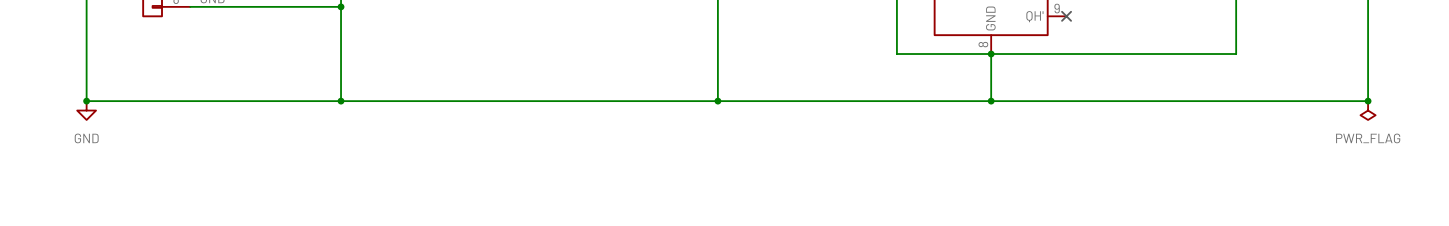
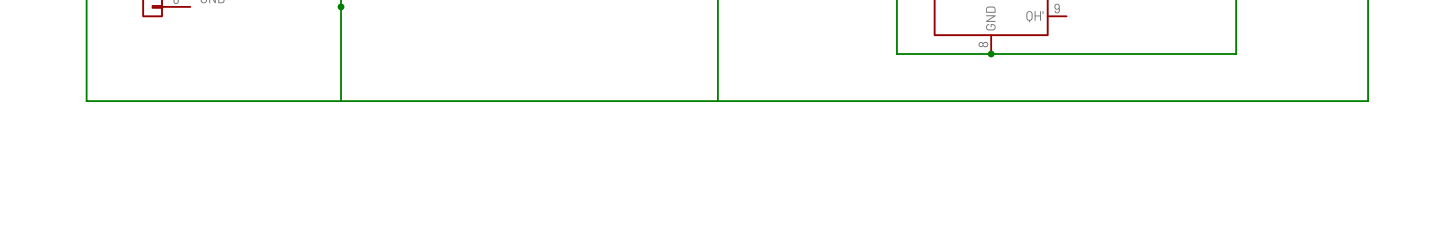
wire: (190, 6) (341, 6) -> none
no-connect mark: (1066, 16) -> none
wire: (991, 54) (991, 101) -> none
junction: (86, 101) -> none
junction: (341, 101) -> none
junction: (717, 101) -> none
junction: (991, 101) -> none
junction: (1368, 101) -> none
power symbol: GND (86, 110) -> none
power symbol: PWR_FLAG (1368, 110) -> none

